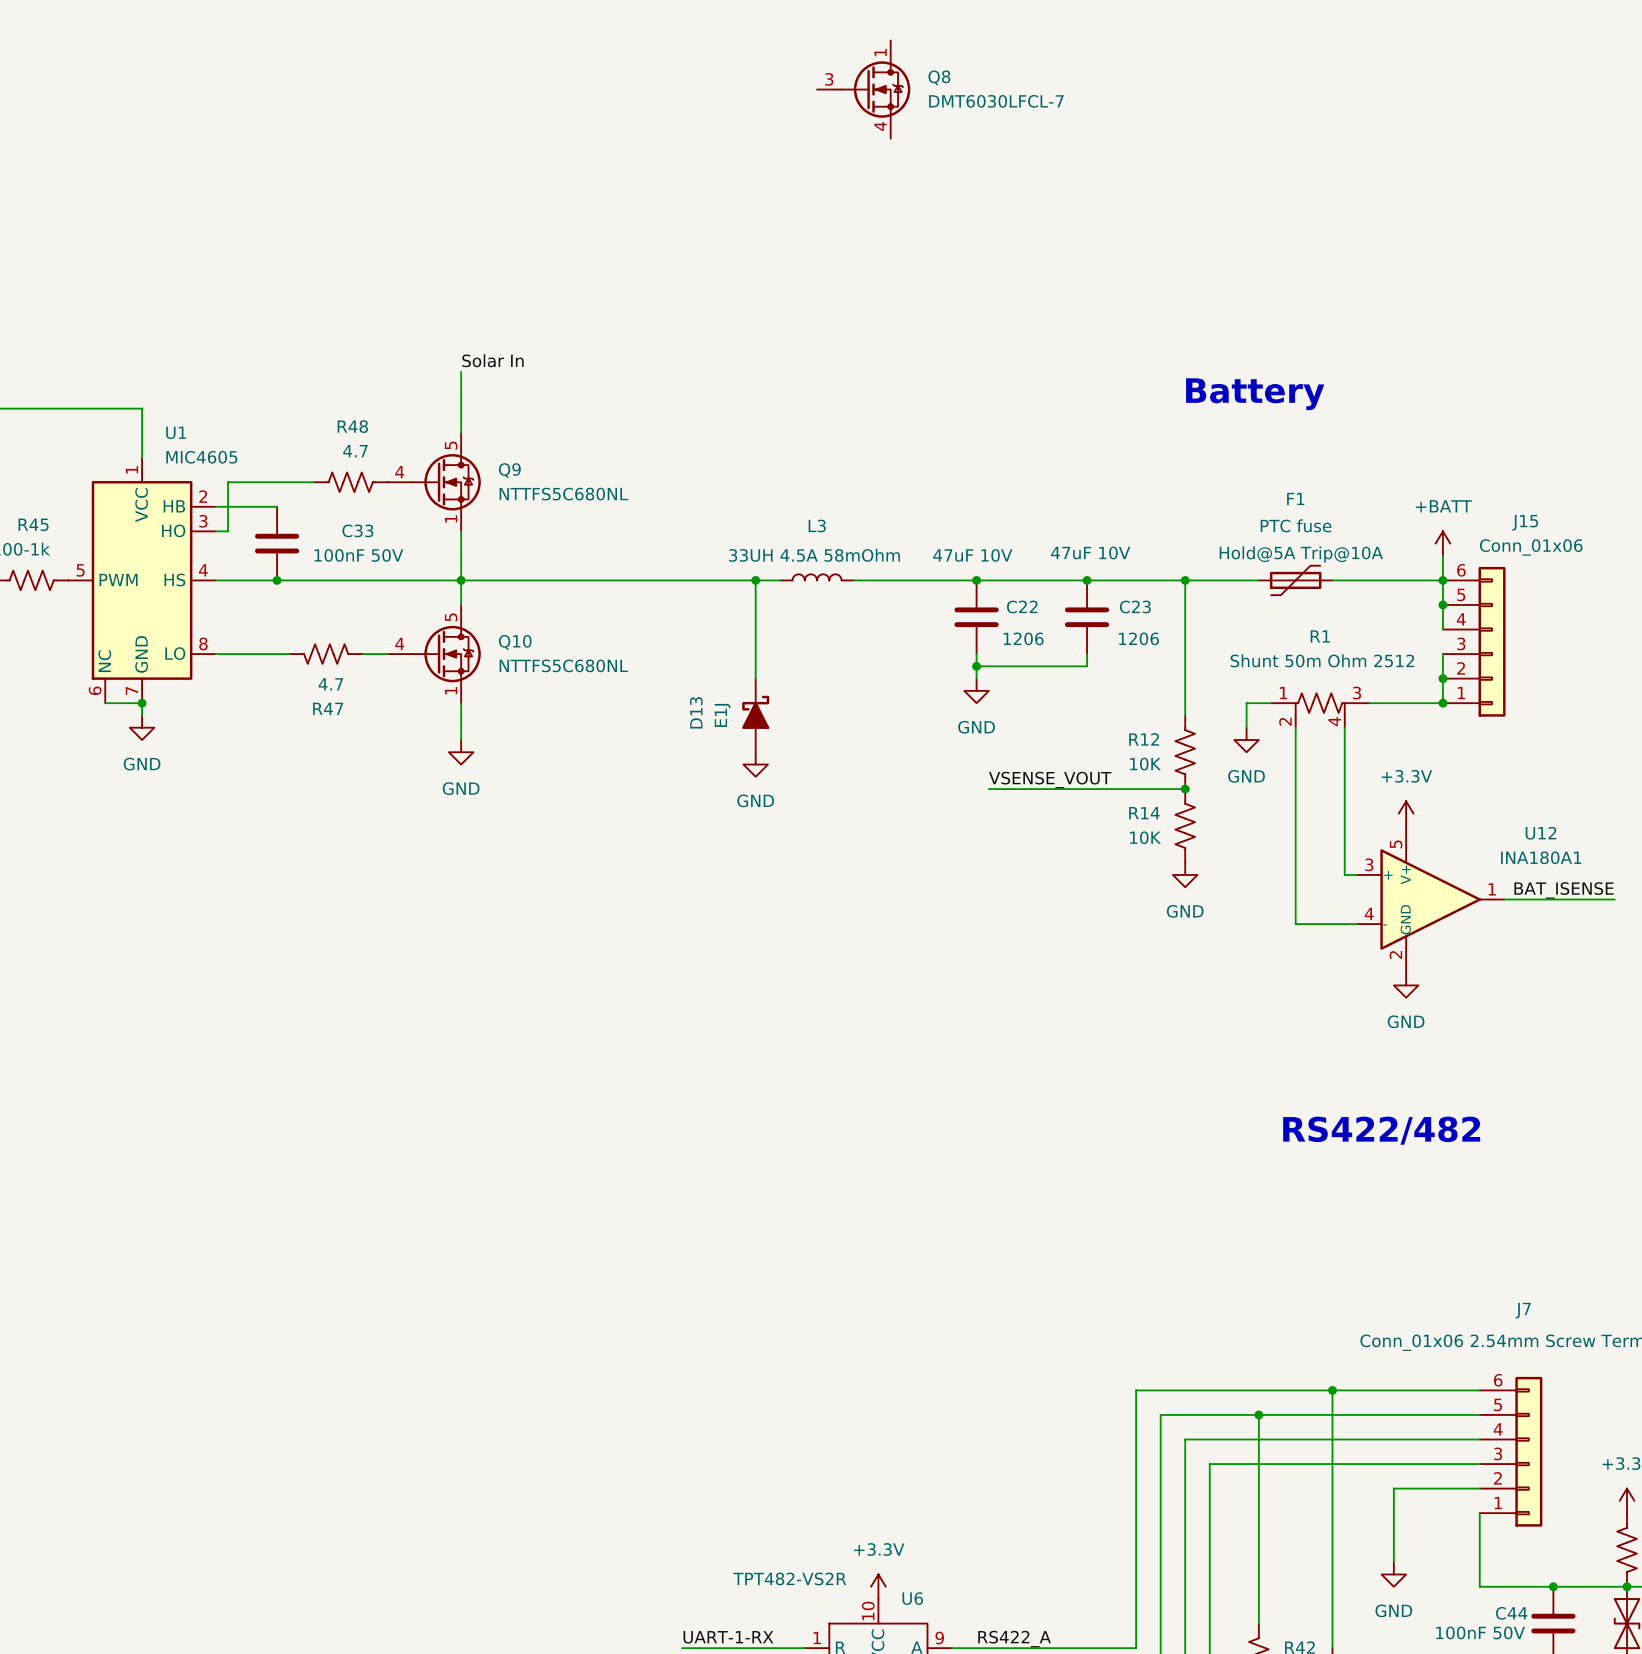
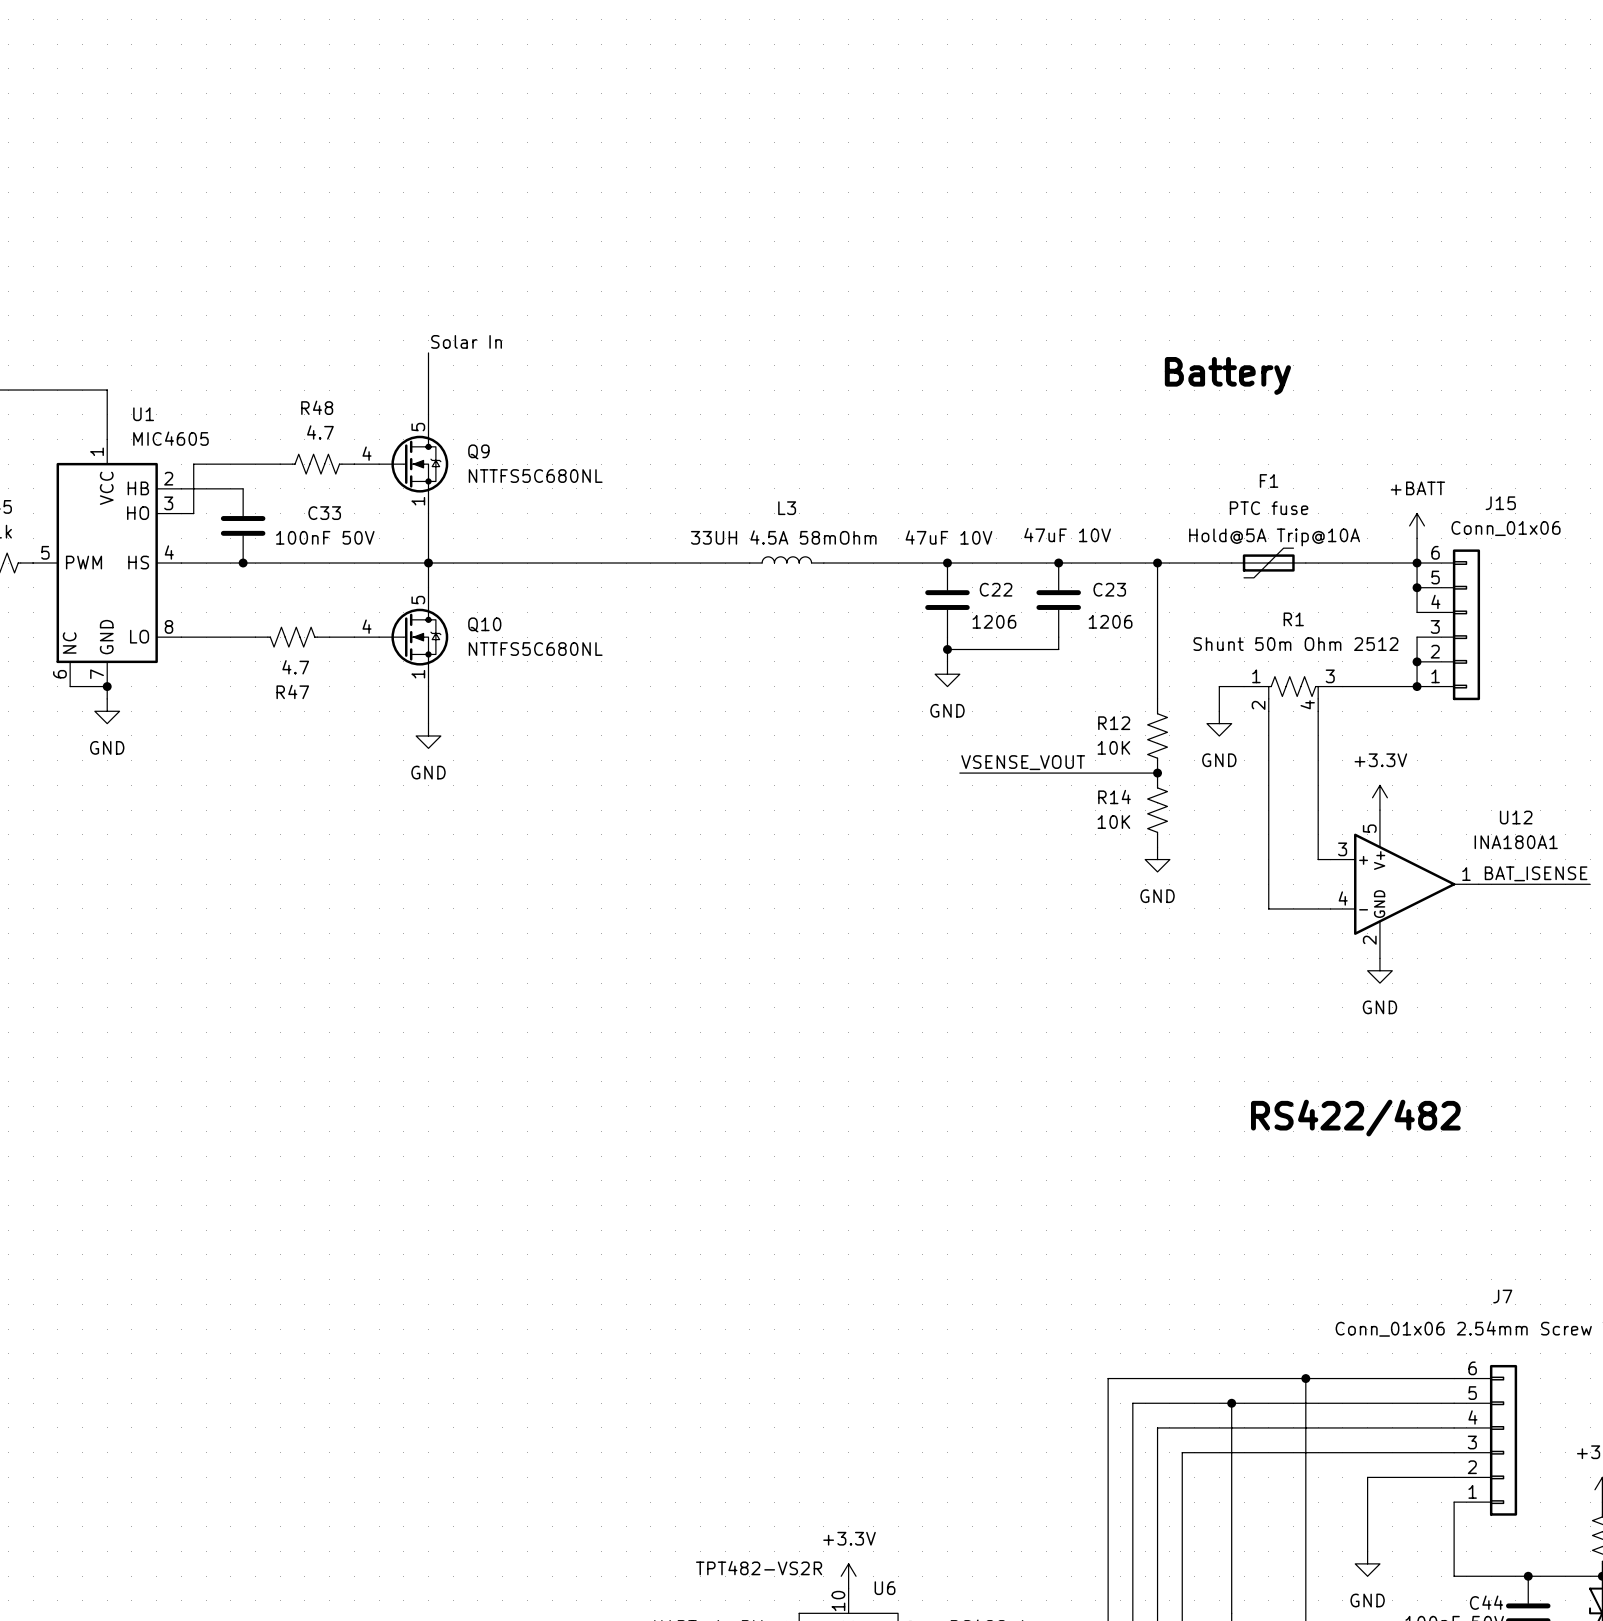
Q8: DMT6030LFCL-7 (863, 89) -> none
wire: (755, 580) (755, 678) -> none
junction: (755, 580) -> none
D13: E1J (755, 715) -> none
power symbol: GND (755, 764) -> none

